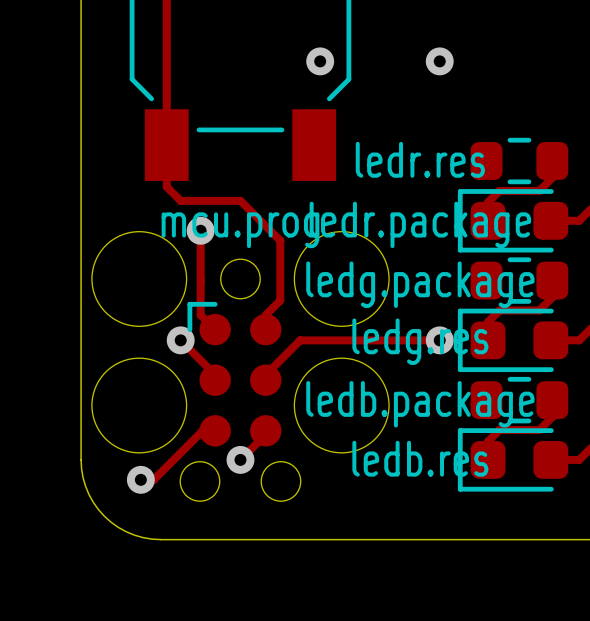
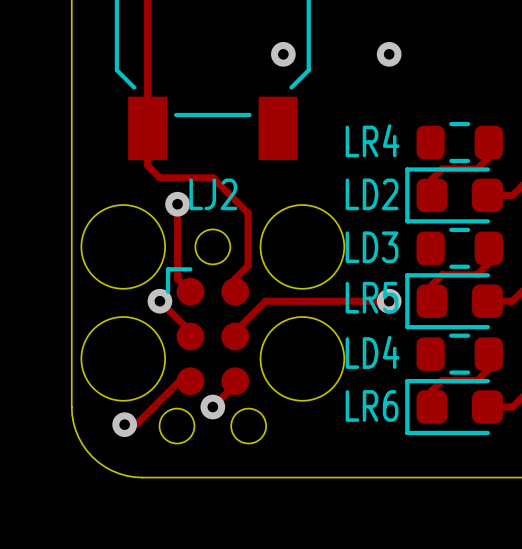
ledr.res name: ledr.res (420, 159) -> LR4 (372, 140)
ledr.package name: ledr.package (420, 224) -> LD2 (372, 194)
mcu.prog name: mcu.prog (240, 230) -> LJ2 (213, 194)
ledg.package name: ledg.package (420, 284) -> LD3 (372, 247)
ledg.res name: ledg.res (420, 341) -> LR5 (372, 297)
ledb.package name: ledb.package (420, 404) -> LD4 (372, 352)
ledb.res name: ledb.res (420, 458) -> LR6 (372, 405)

